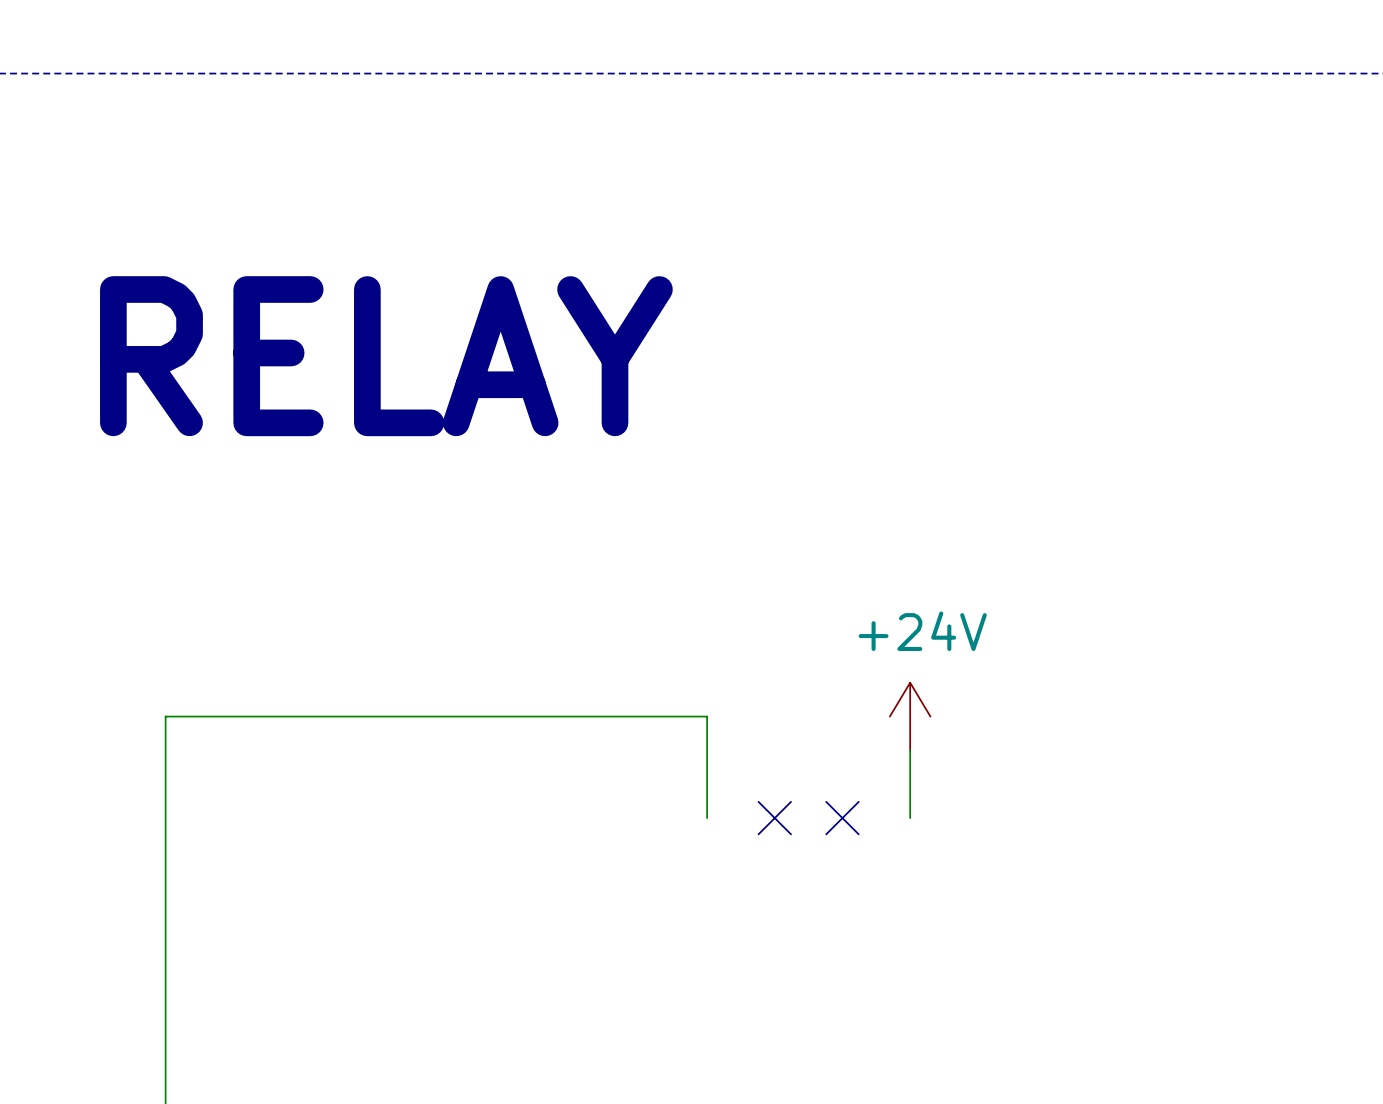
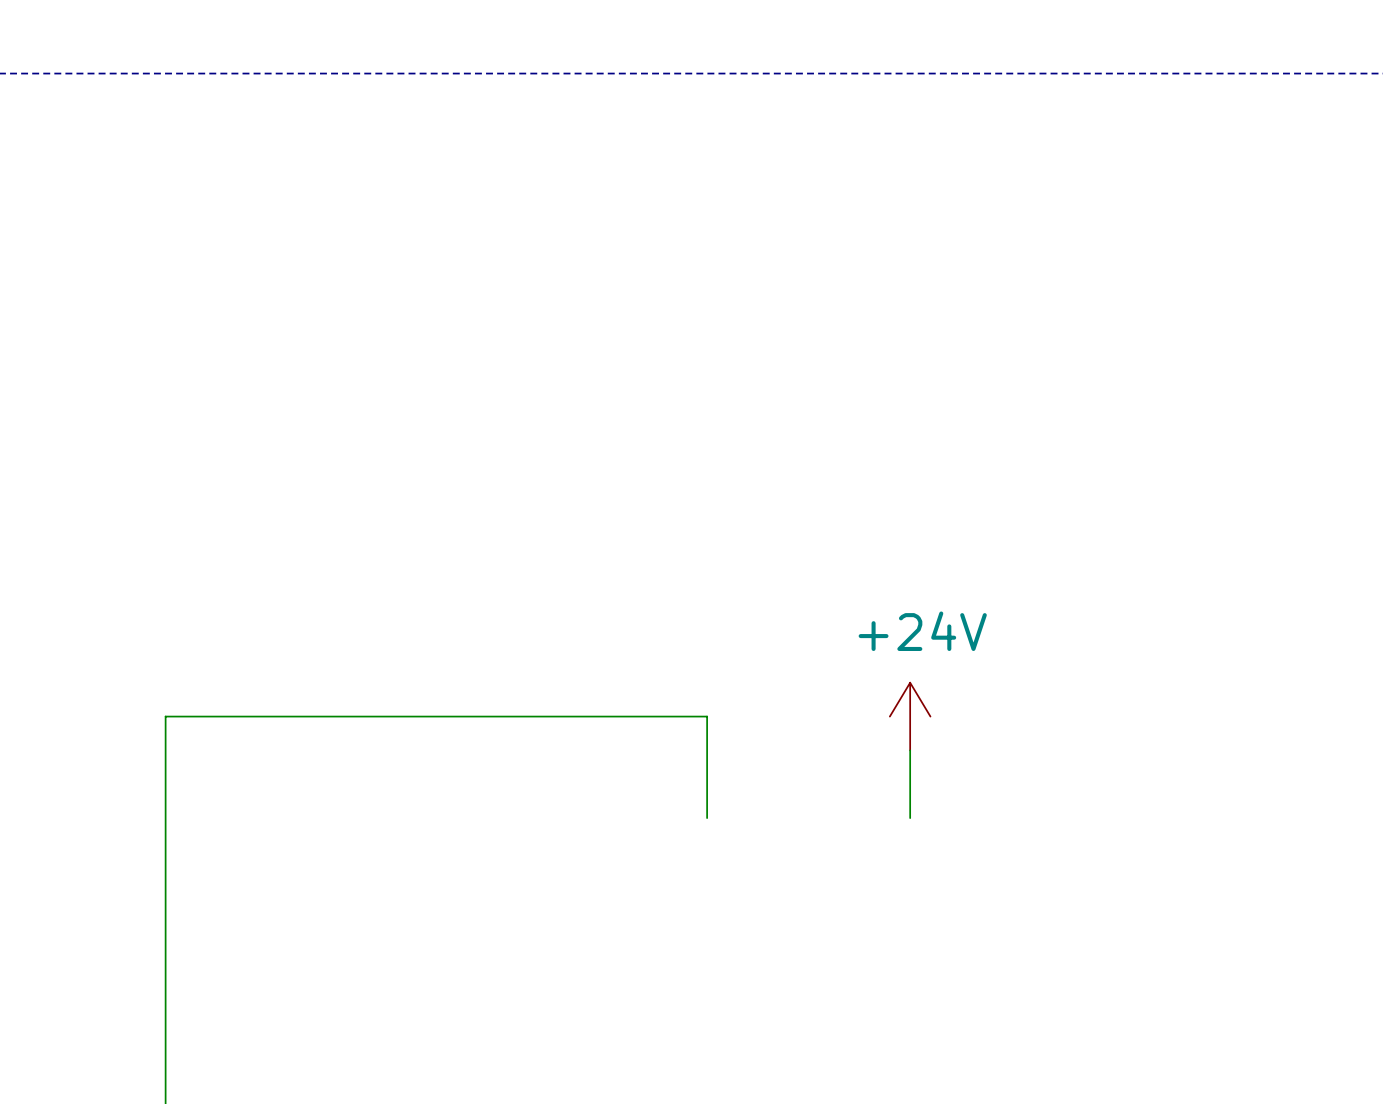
text: RELAY (386, 356) -> none
no-connect mark: (774, 818) -> none
no-connect mark: (842, 818) -> none

